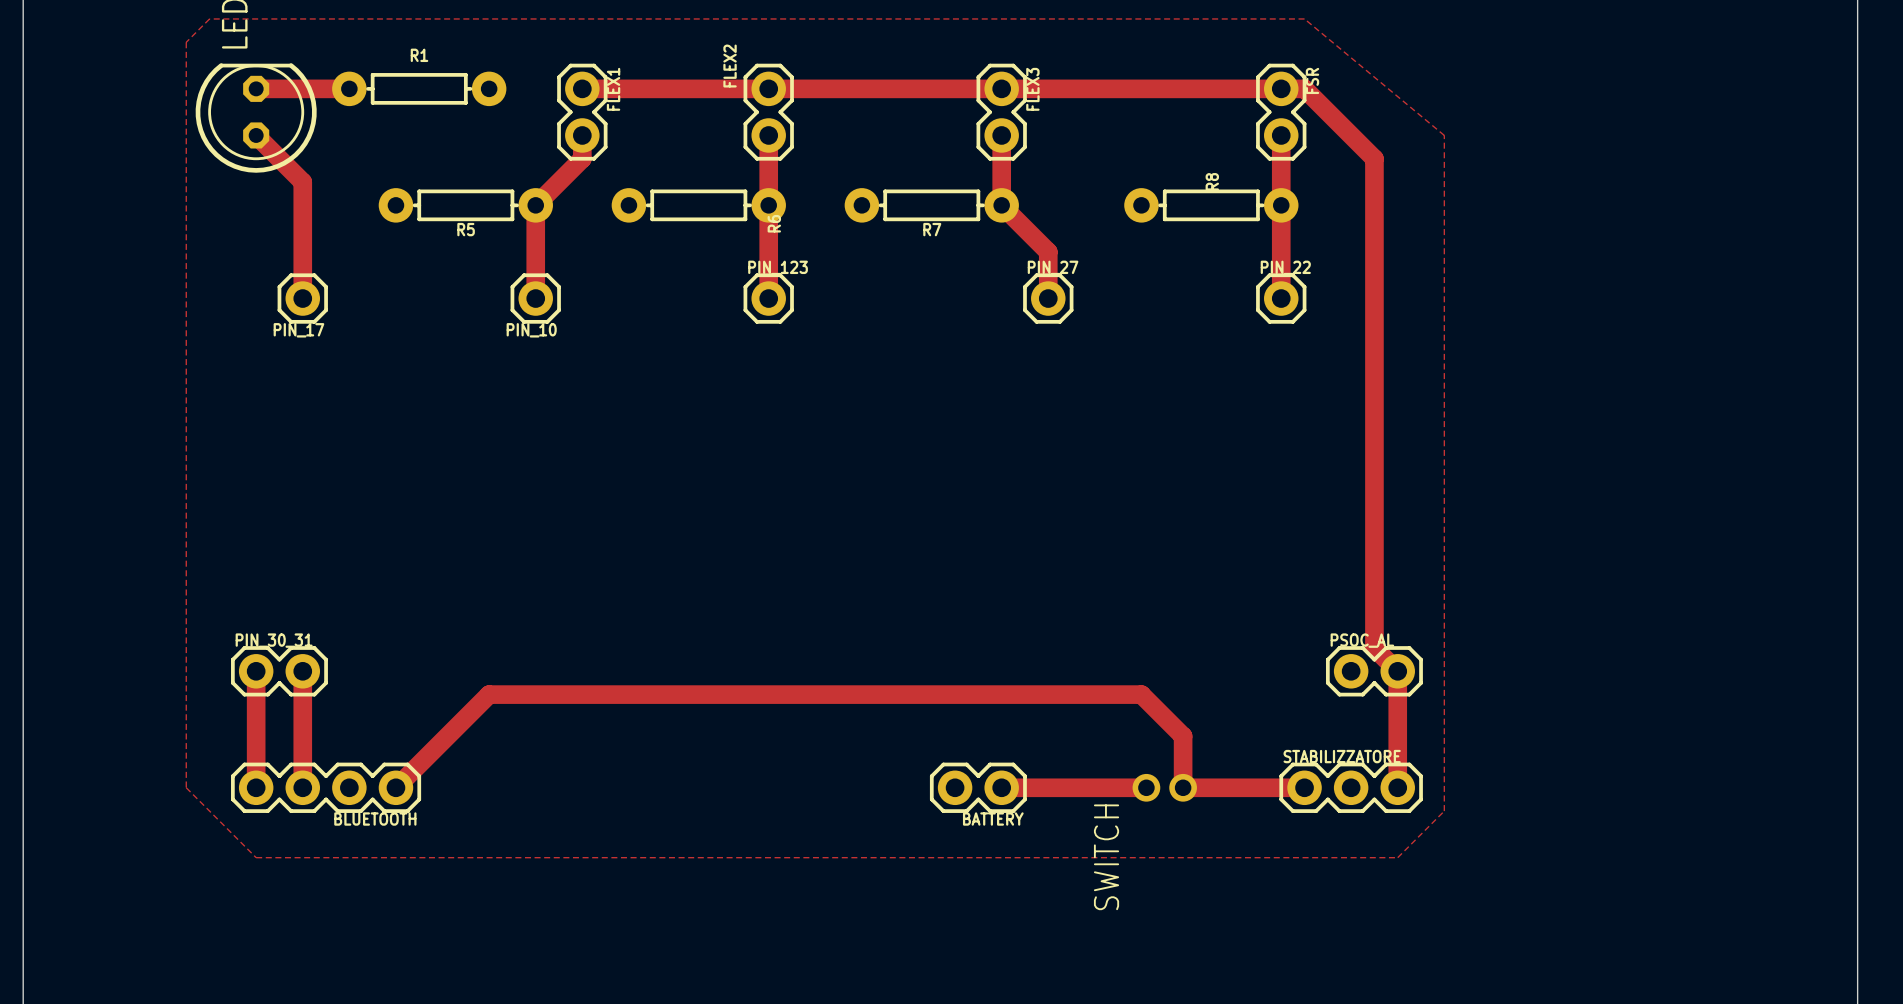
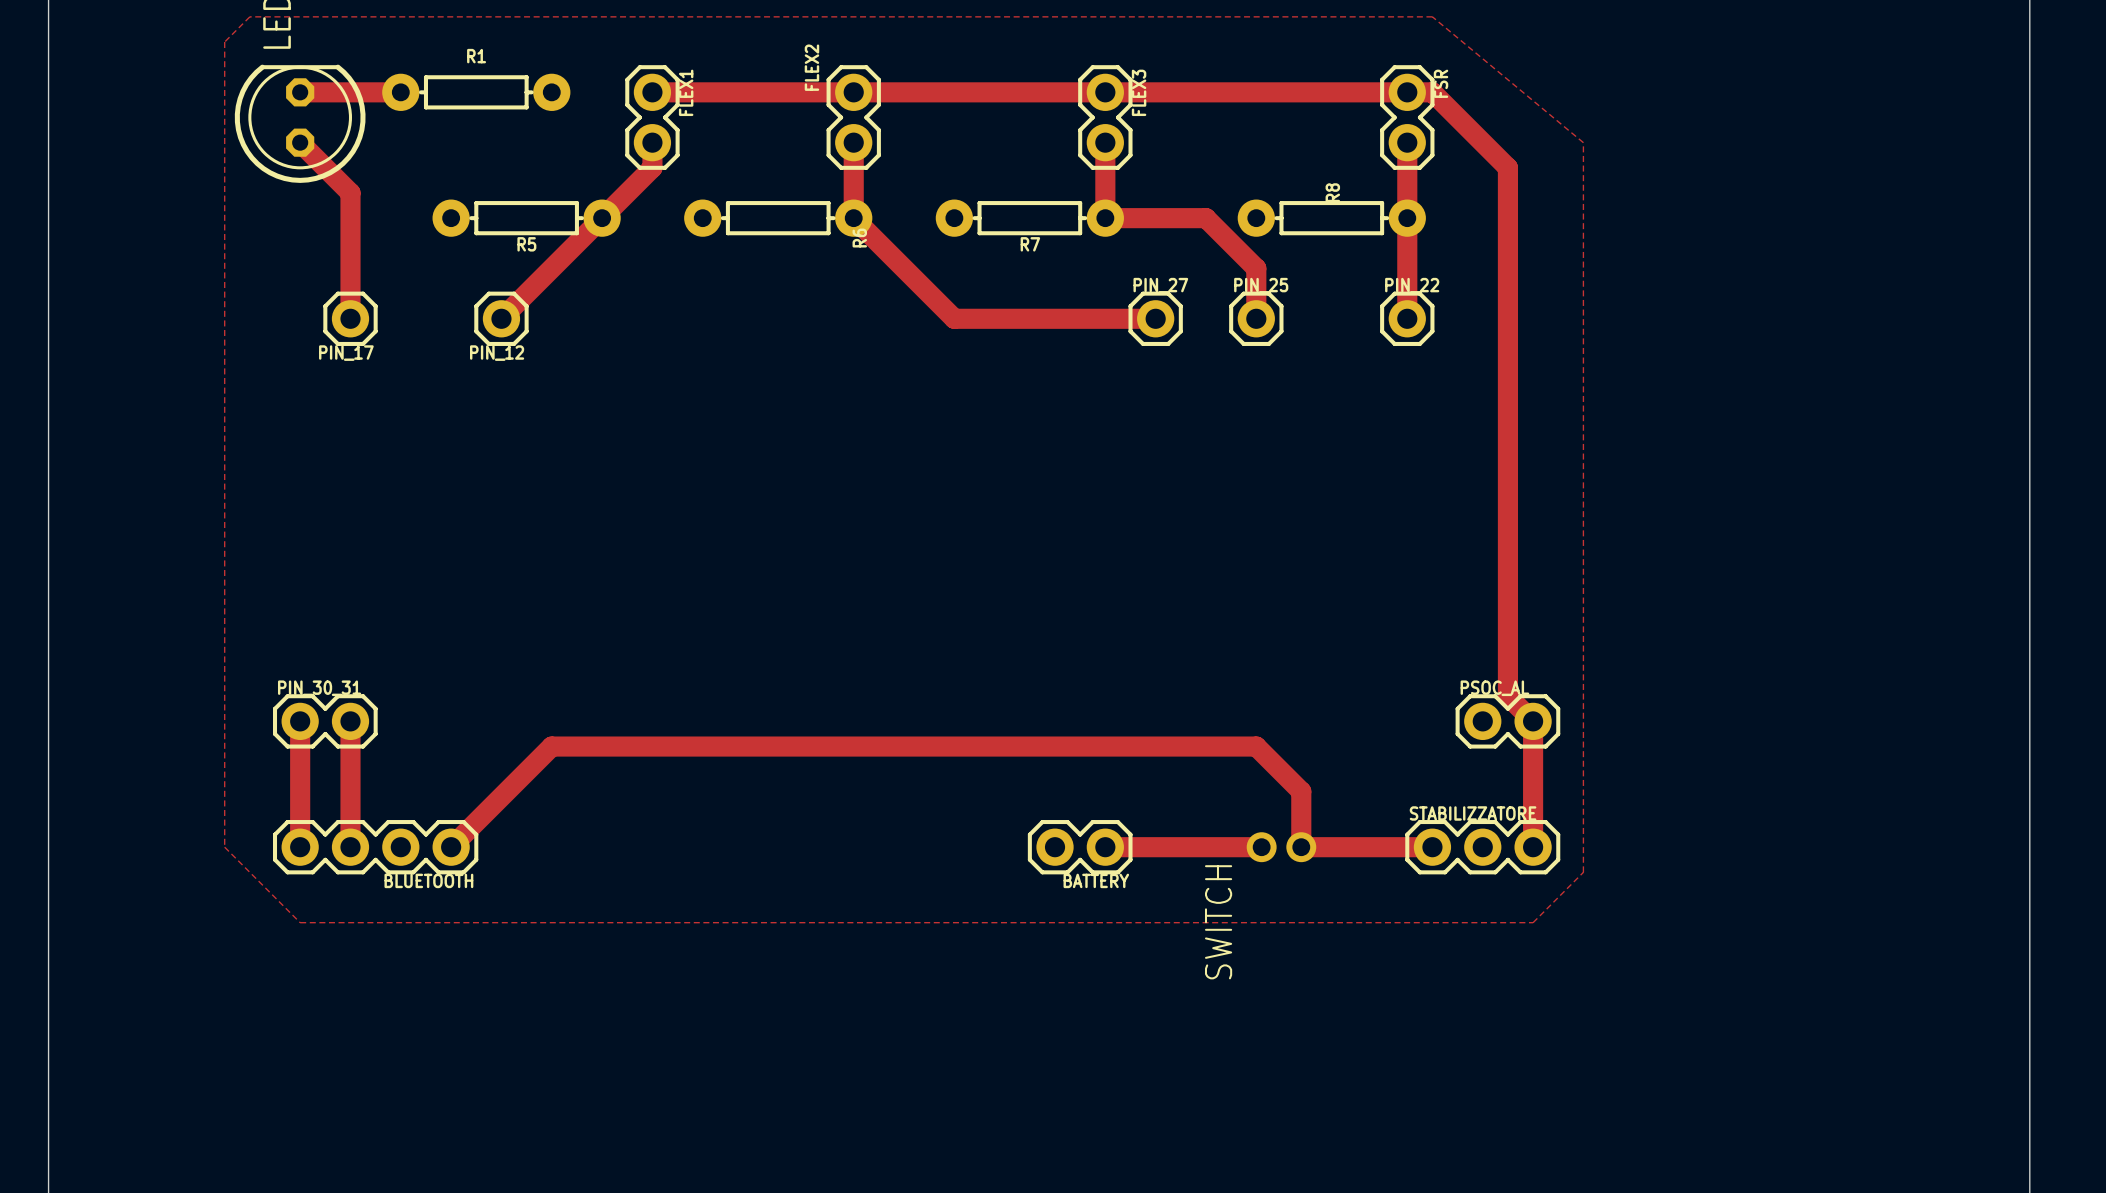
top track: (535, 205) (535, 298) -> (602, 218) (501, 318)
top track: (768, 205) (768, 298) -> (853, 218) (954, 318) (1155, 318)
top track: (1001, 205) (1048, 251) (1048, 298) -> (1105, 218) (1205, 218) (1256, 268) (1256, 318)
PIN_12: none -> (501, 318)
PIN_10: (535, 298) -> none
PIN_123: (768, 298) -> none
PIN_25: none -> (1256, 318)

